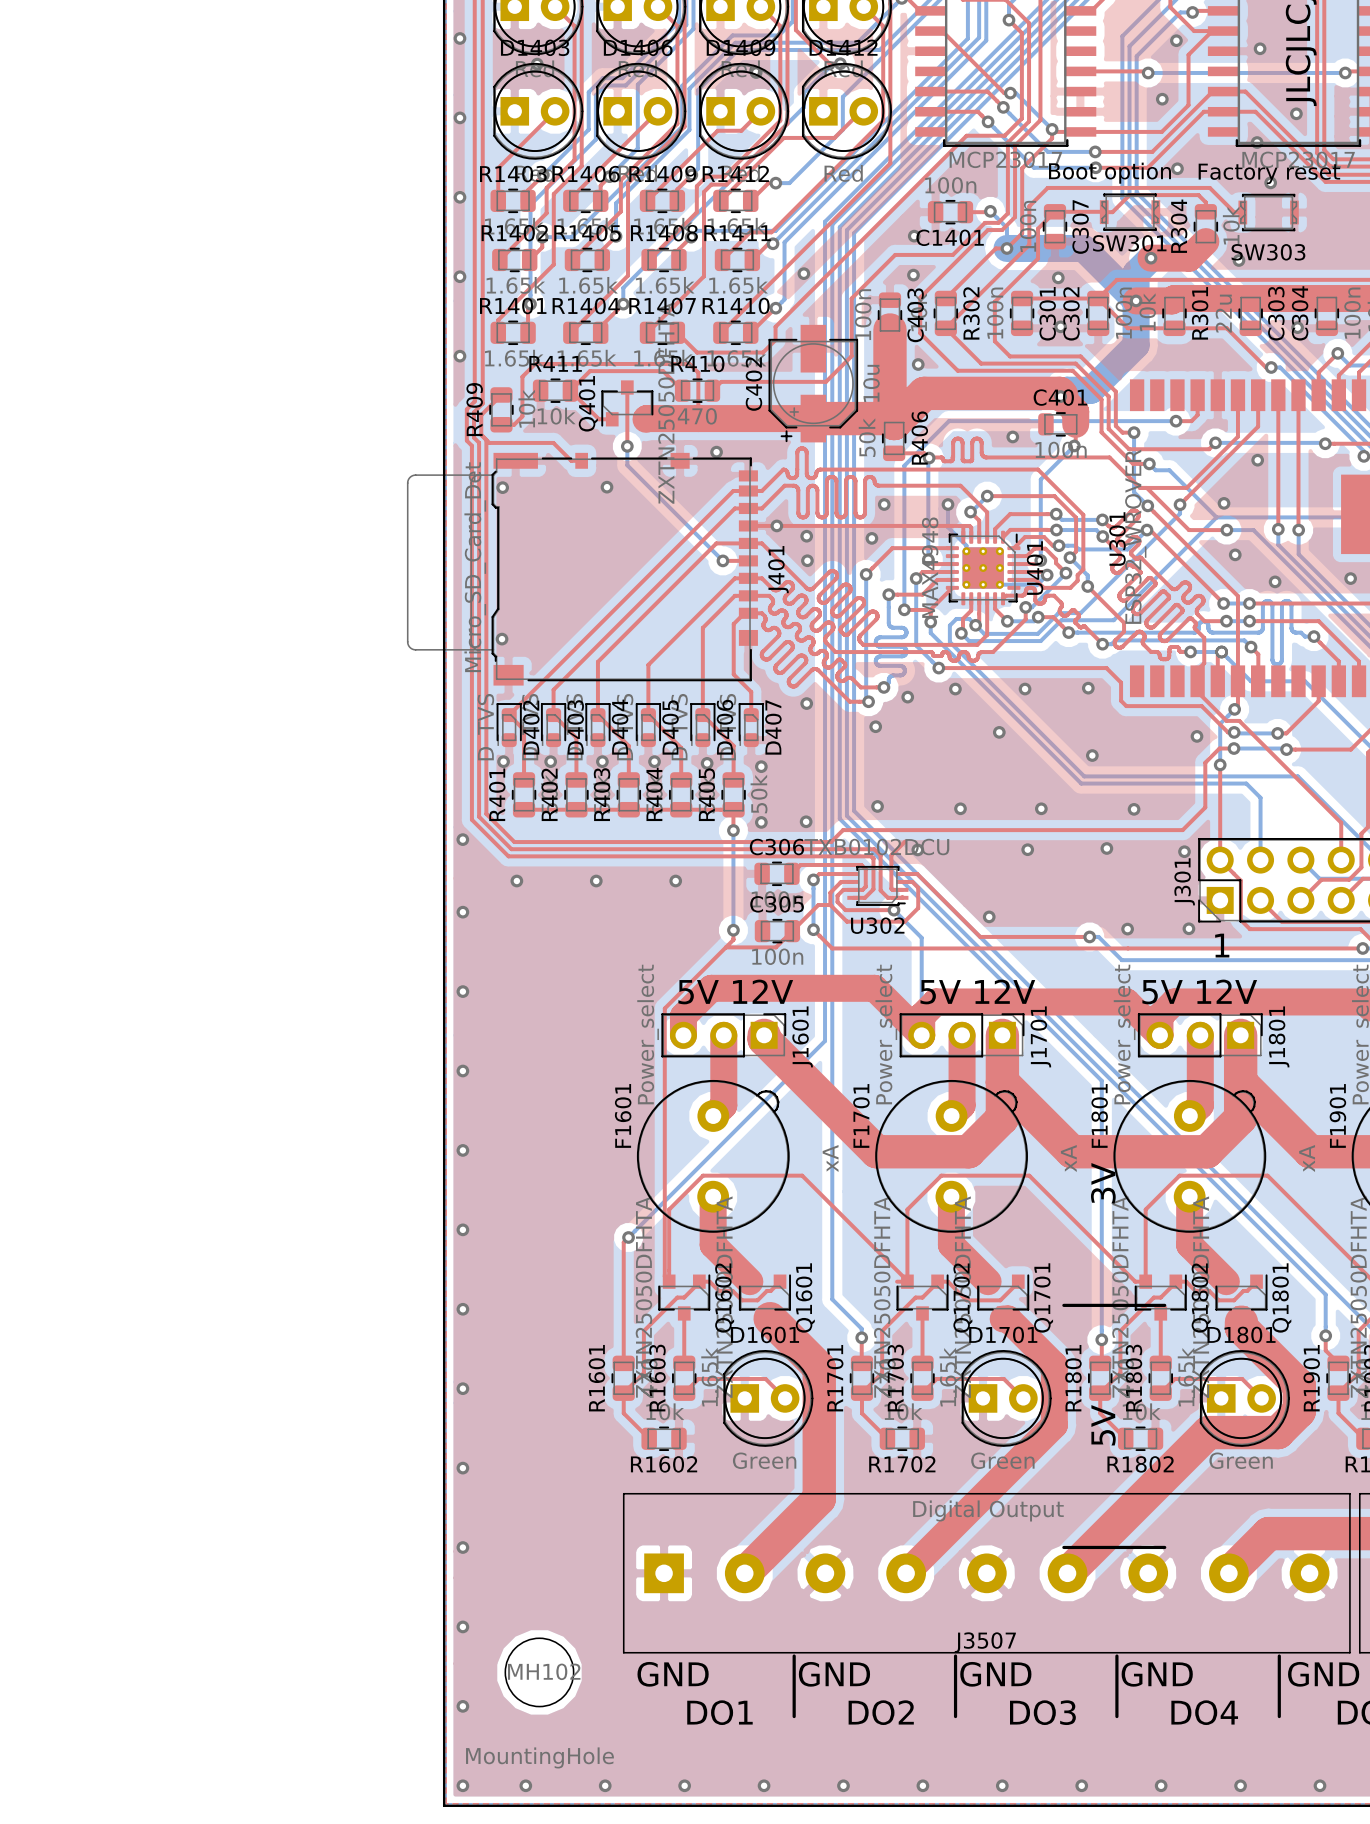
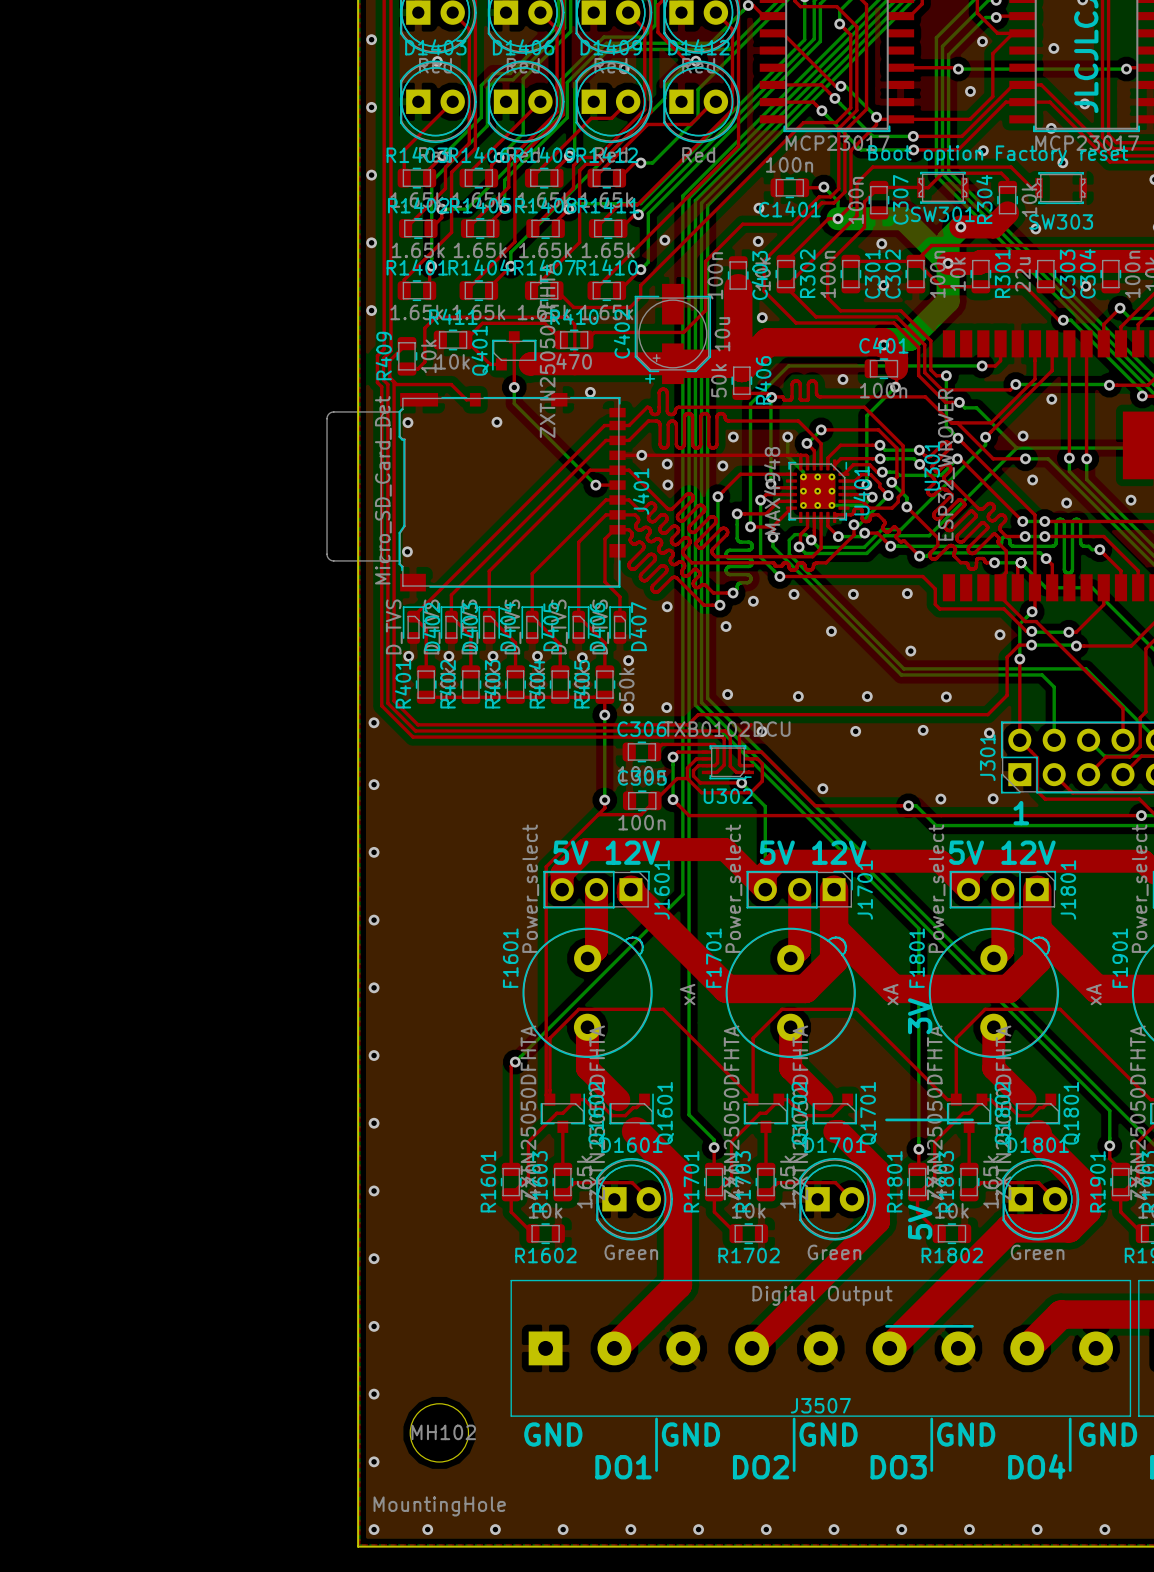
via: (516, 881) -> none
via: (596, 881) -> none
via: (675, 881) -> none

